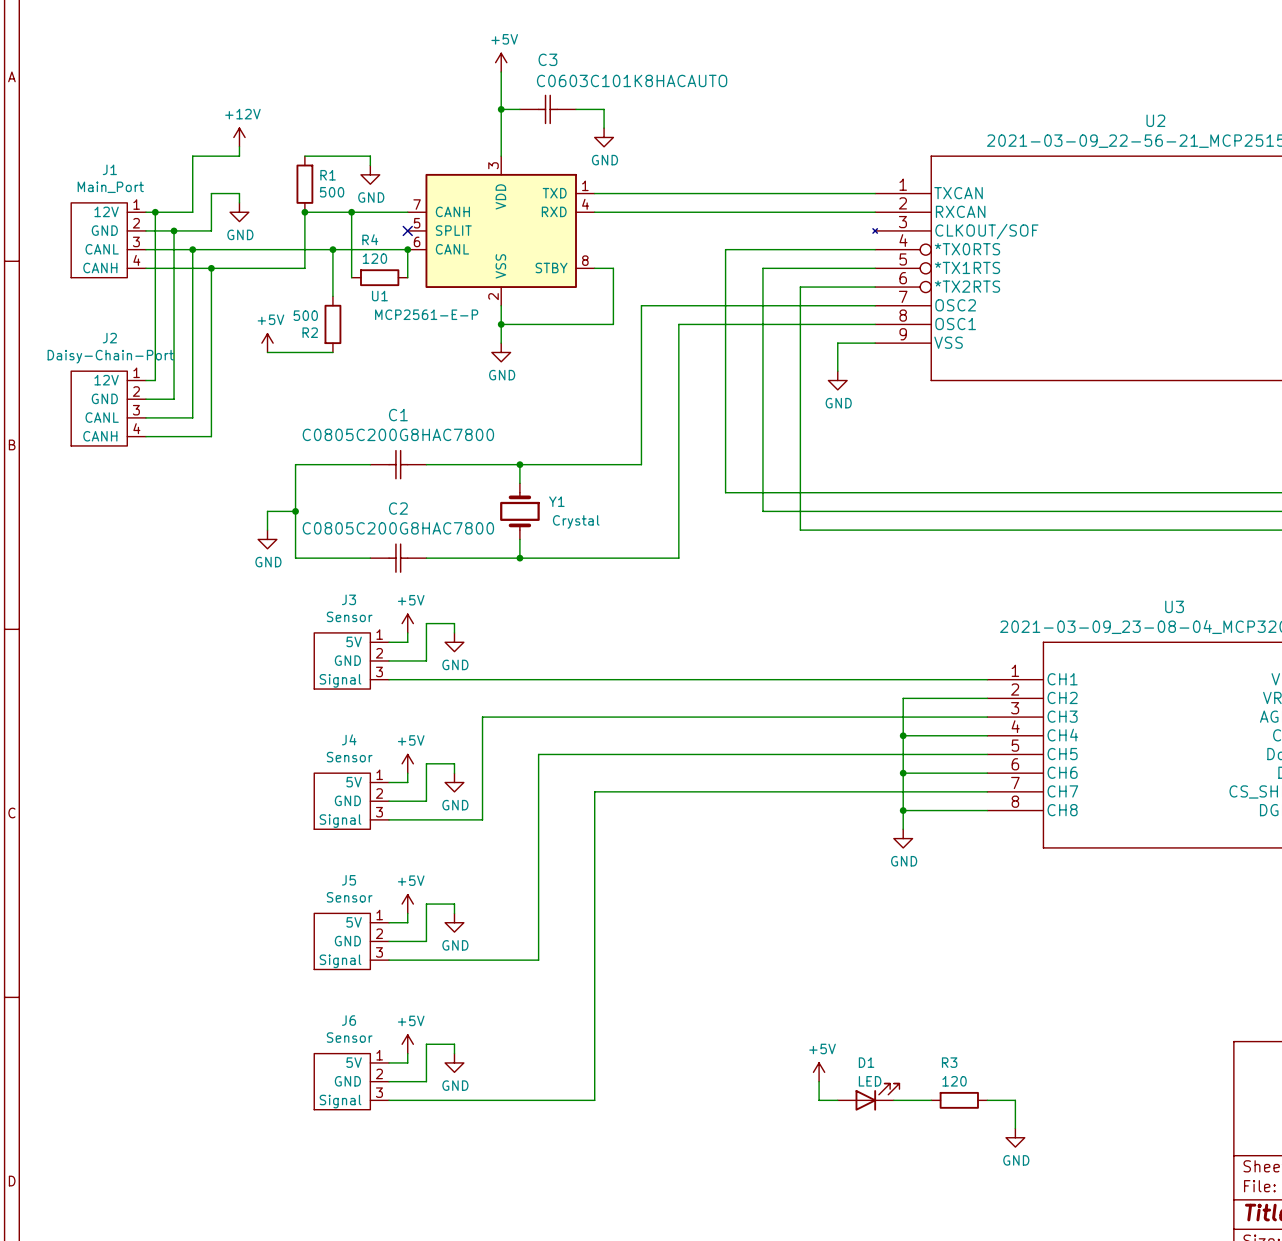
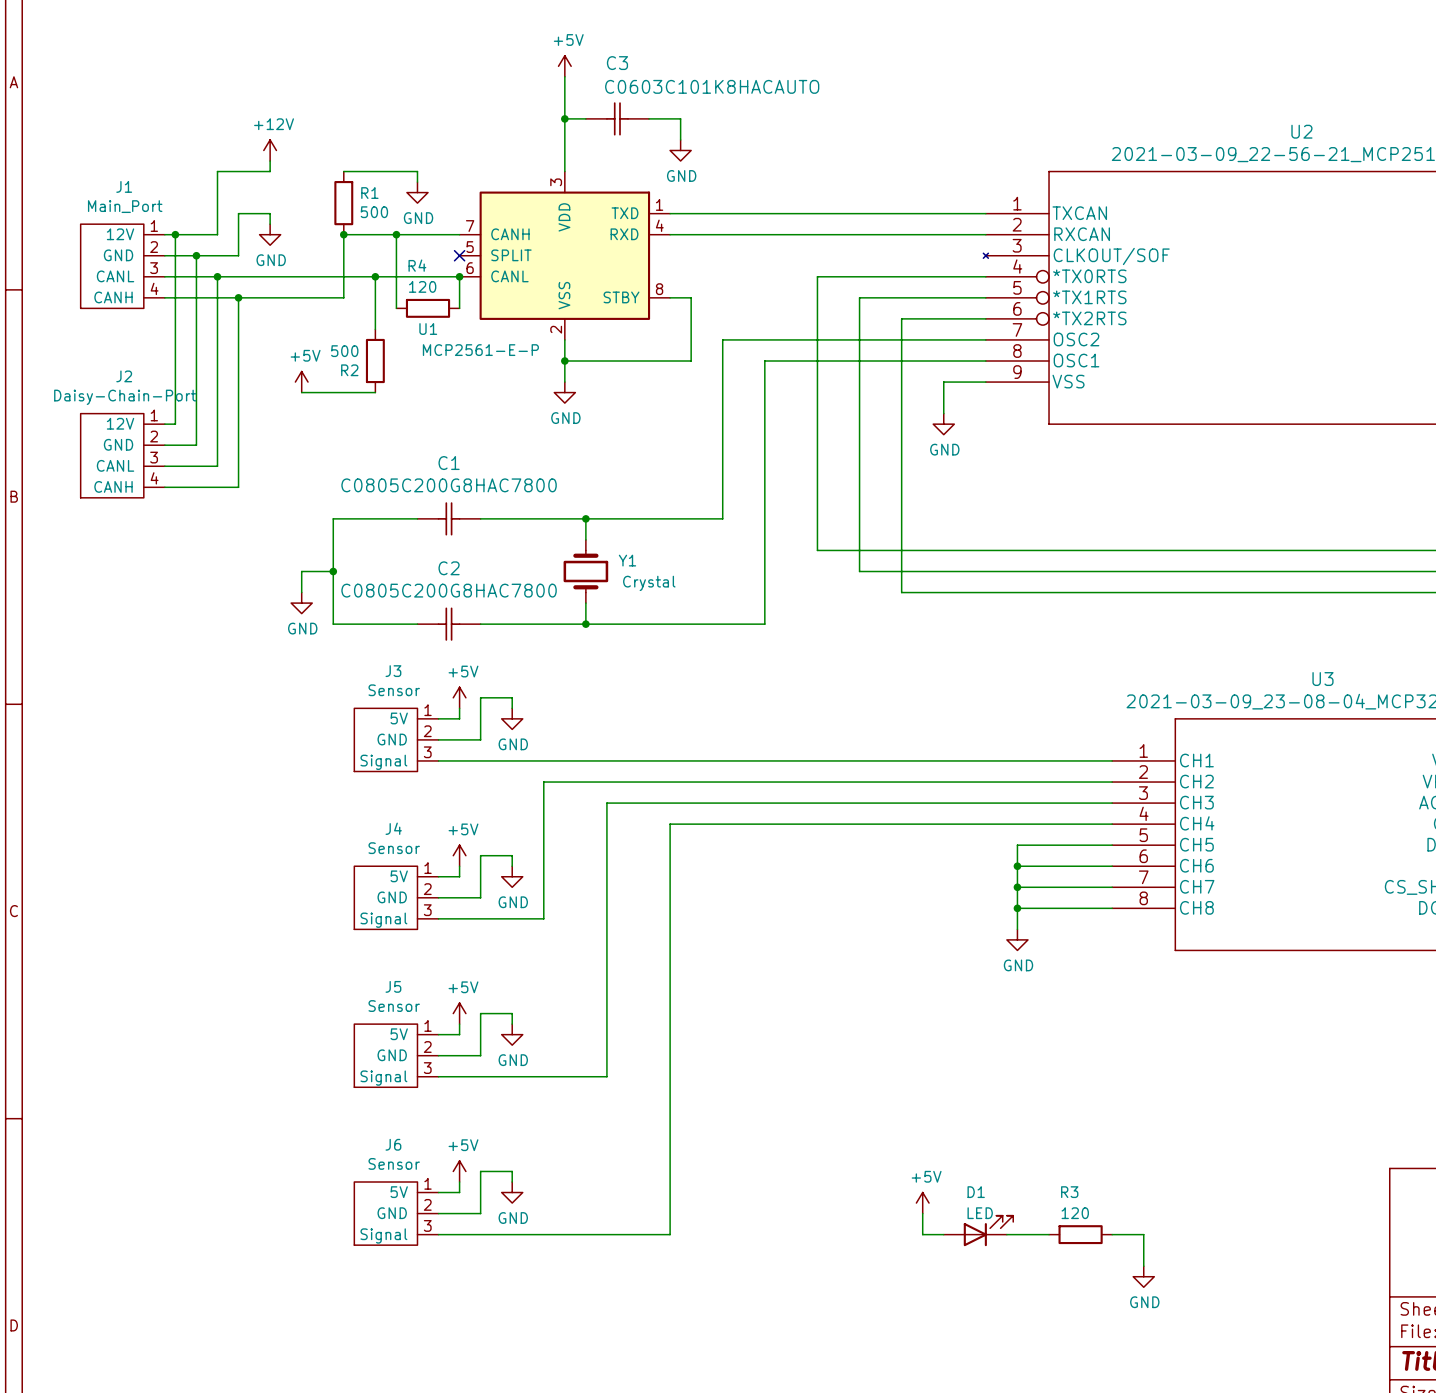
wire: (903, 698) (903, 754) (538, 754) -> (1017, 782) (543, 782) (543, 803)
wire: (482, 717) (538, 717) -> (606, 845) (606, 803)
junction: (903, 735) -> none
wire: (594, 791) (903, 791) -> (670, 887) (670, 824) (1017, 824)
junction: none -> (1017, 887)

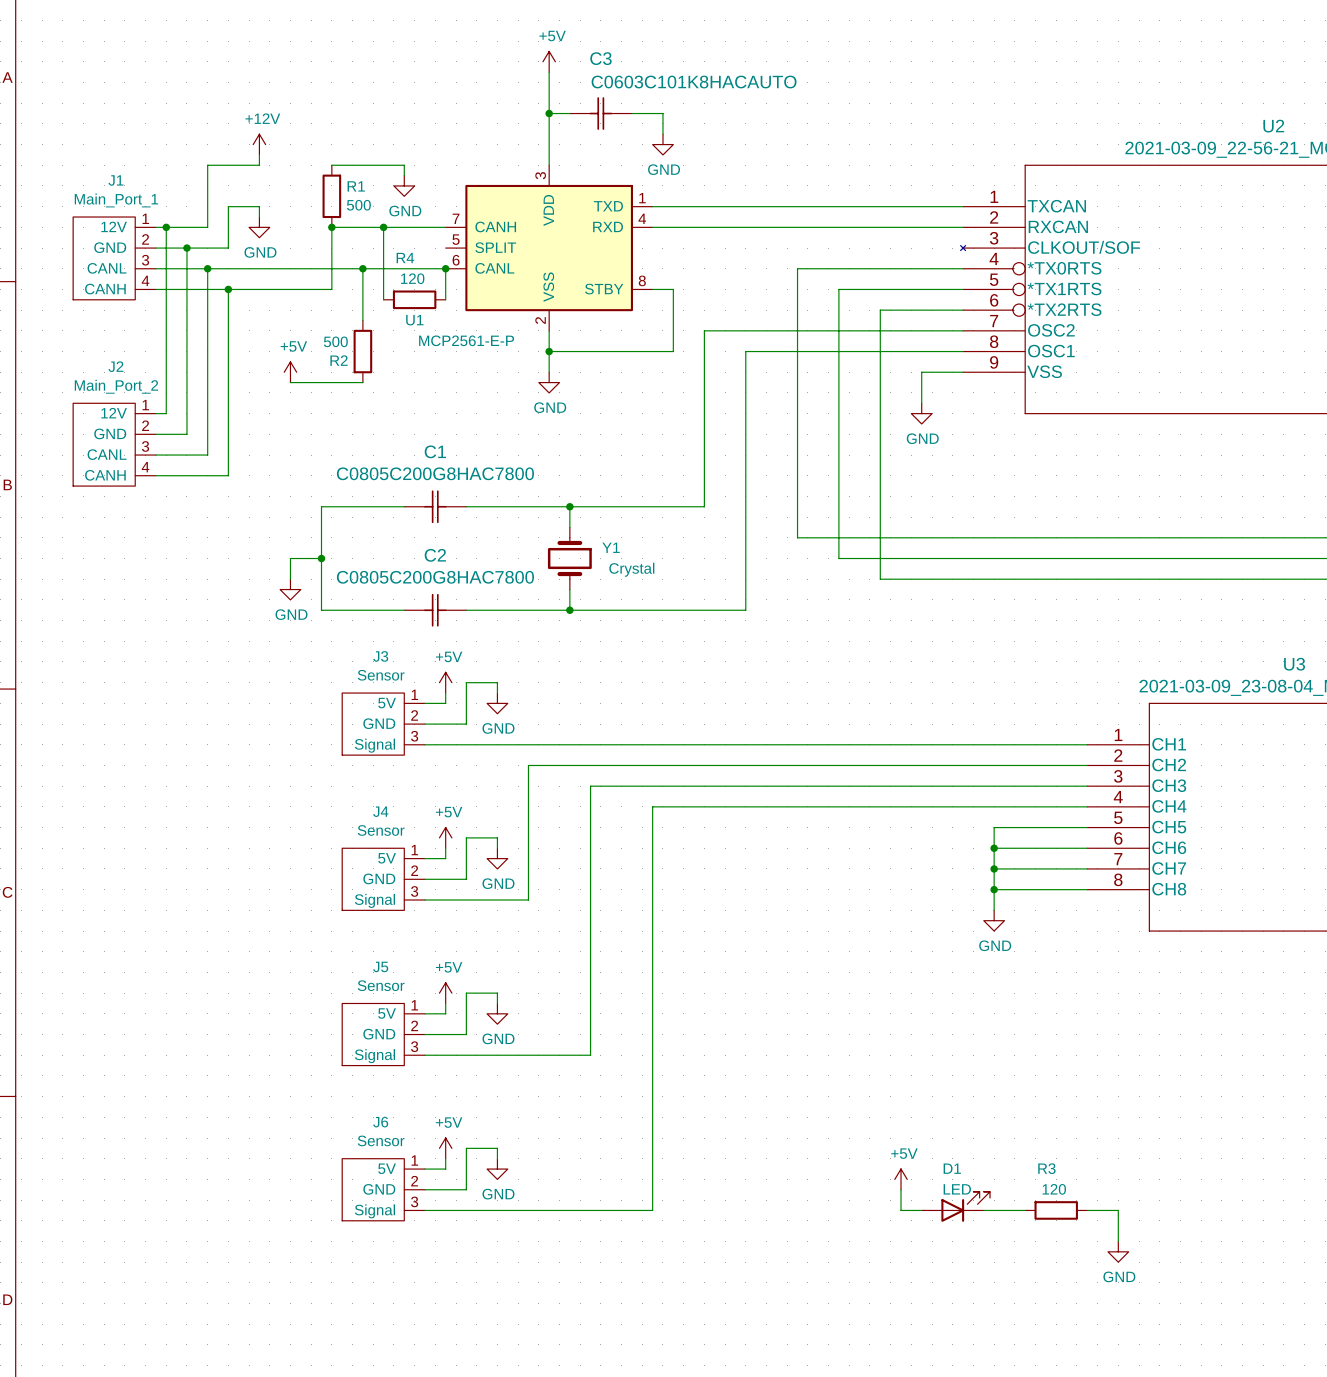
J1 value: Main_Port (125, 206) -> Main_Port_1 (116, 200)
no-connect mark: (459, 255) -> none
J2 value: Daisy-Chain-Port (125, 397) -> Main_Port_2 (116, 386)

